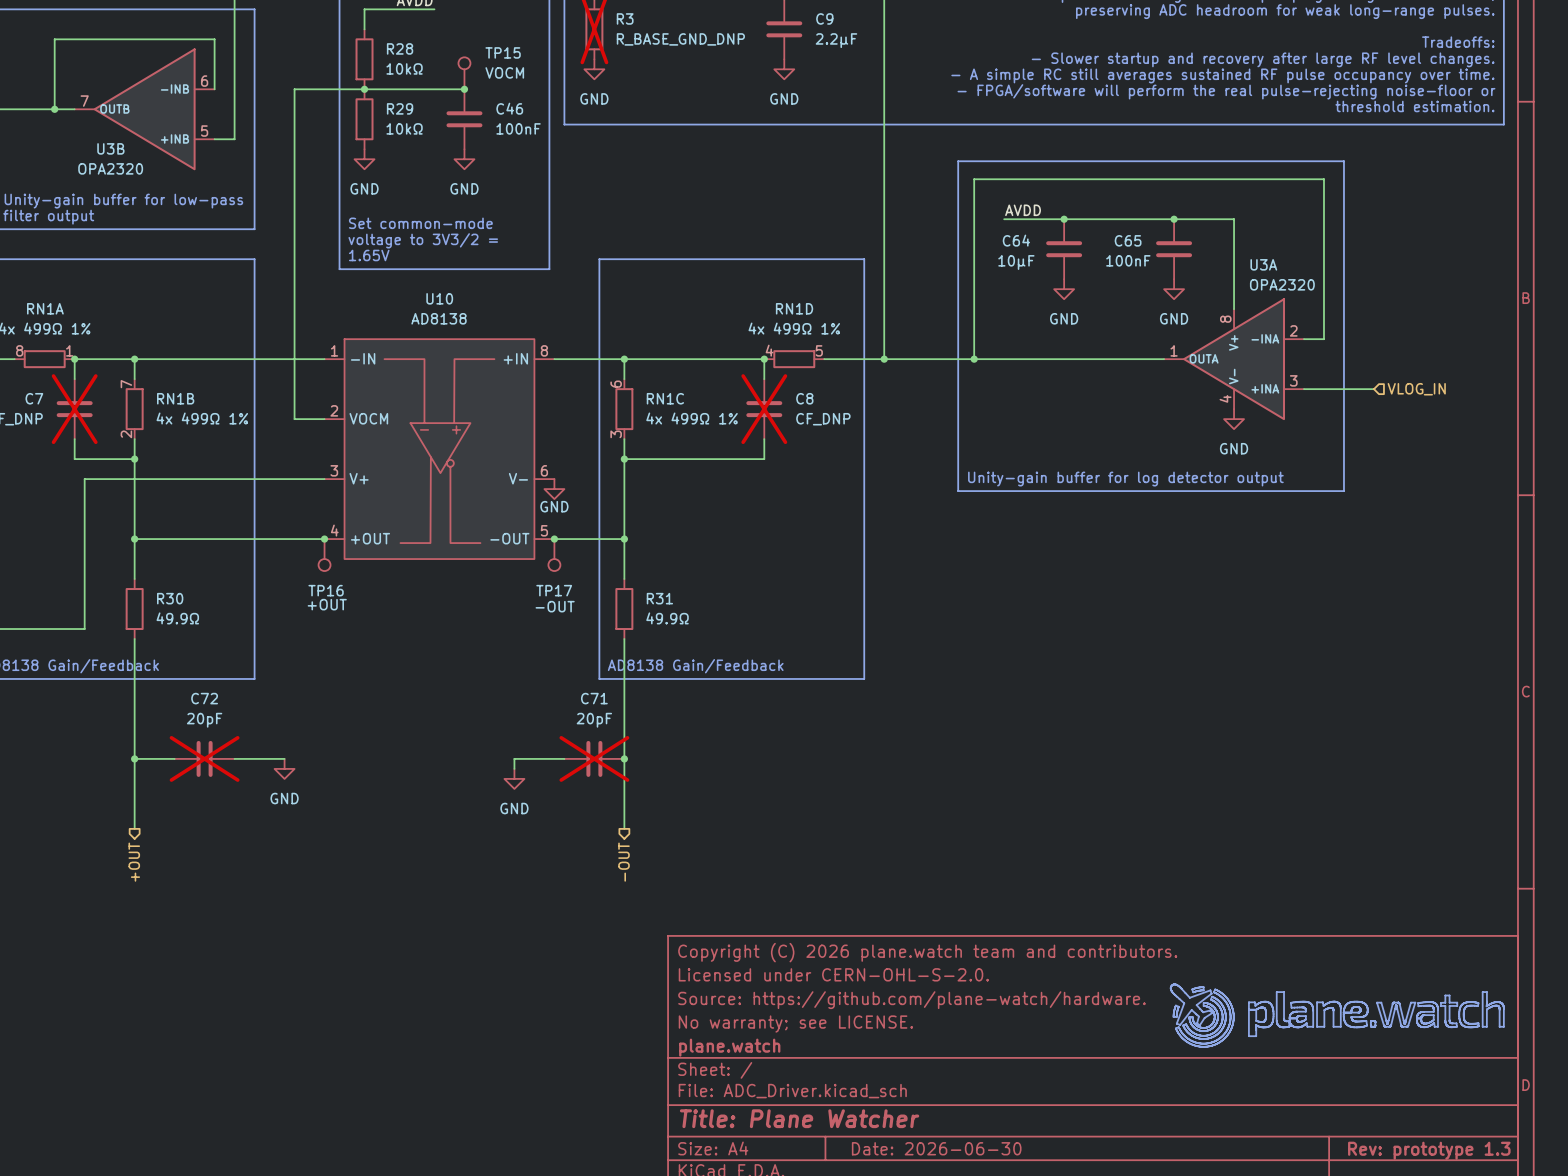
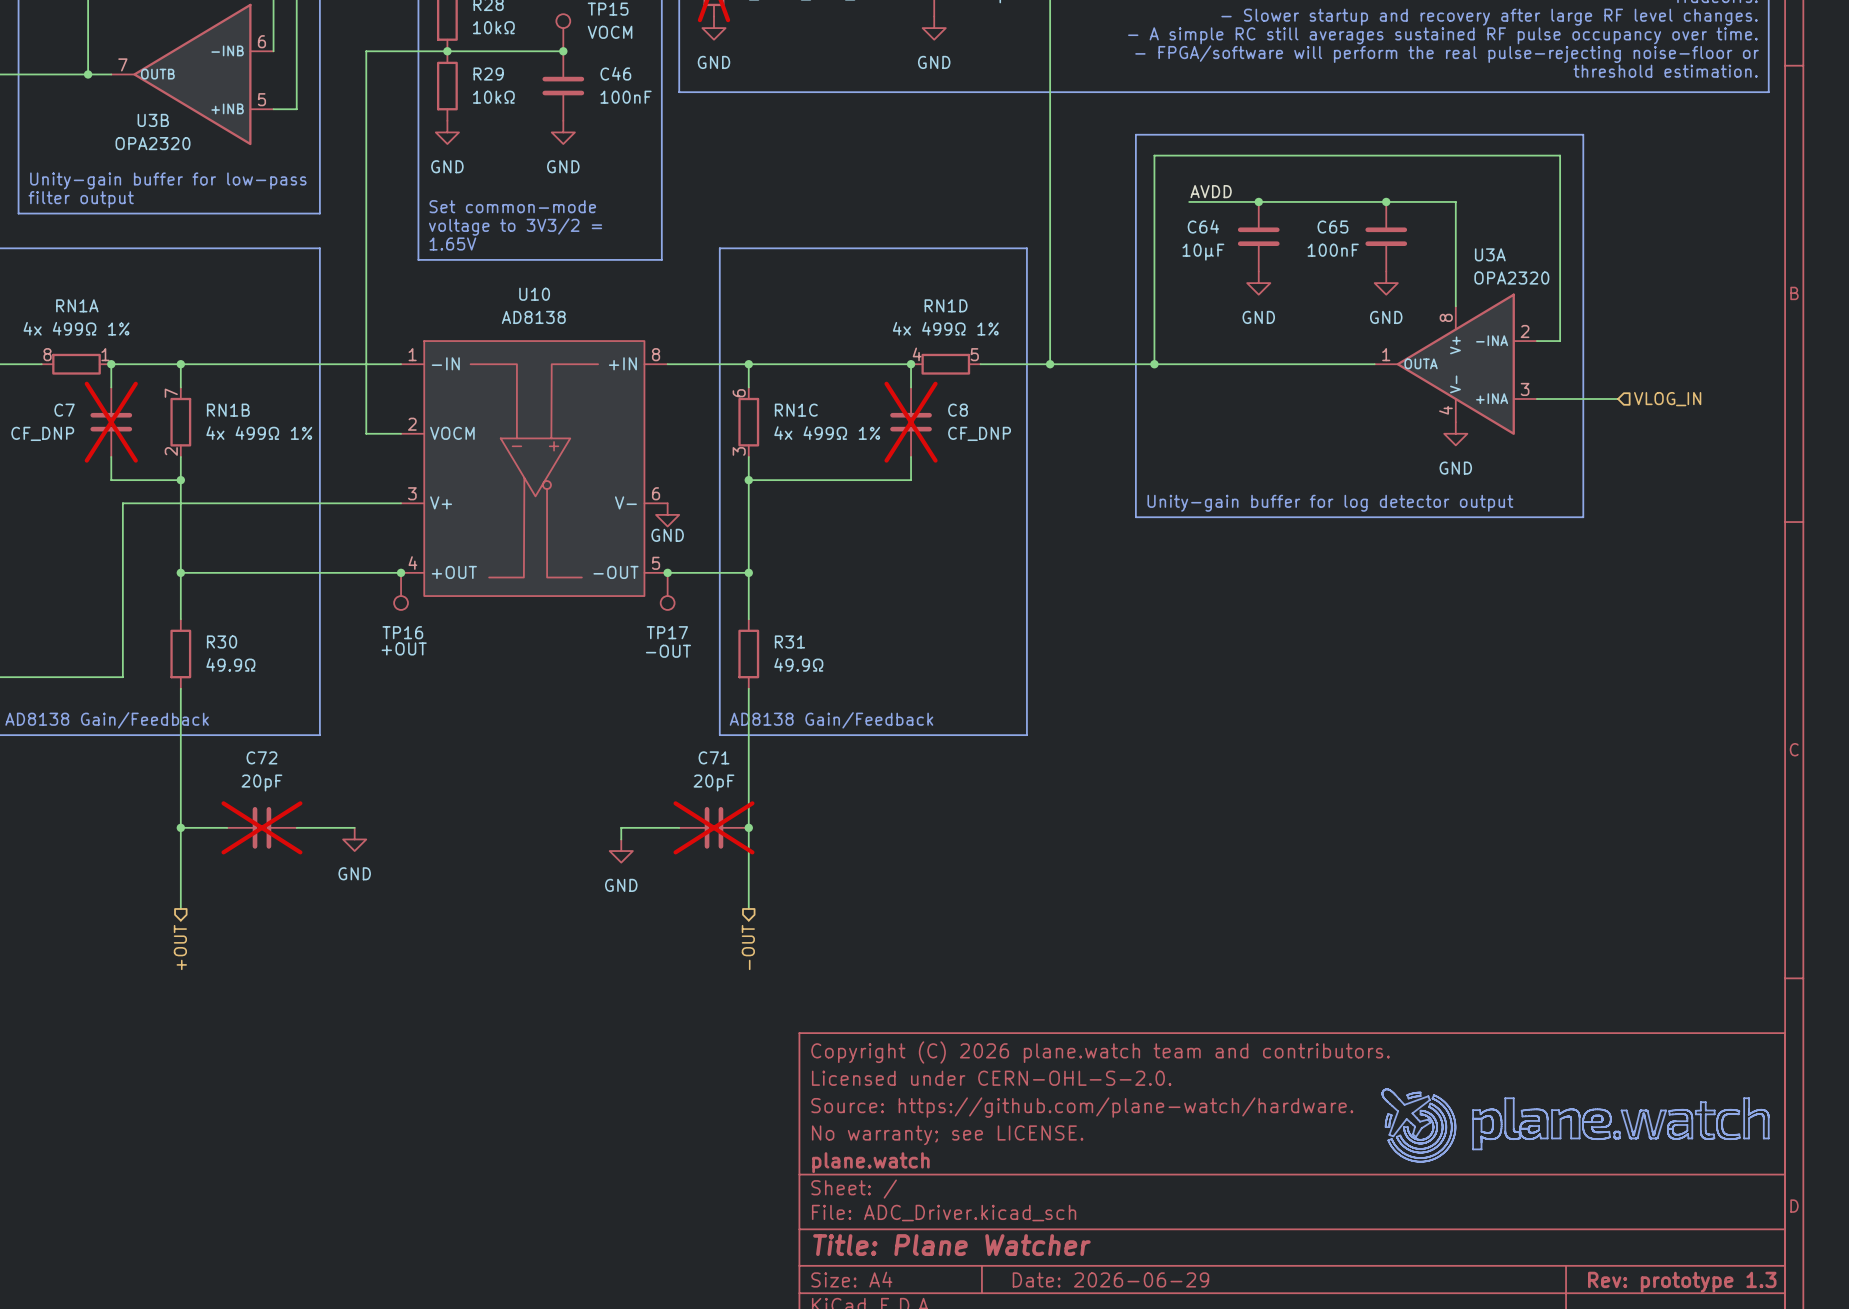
title block: Date: 2026-06-30 (936, 1148) -> Date: 2026-06-29 (1110, 1279)

